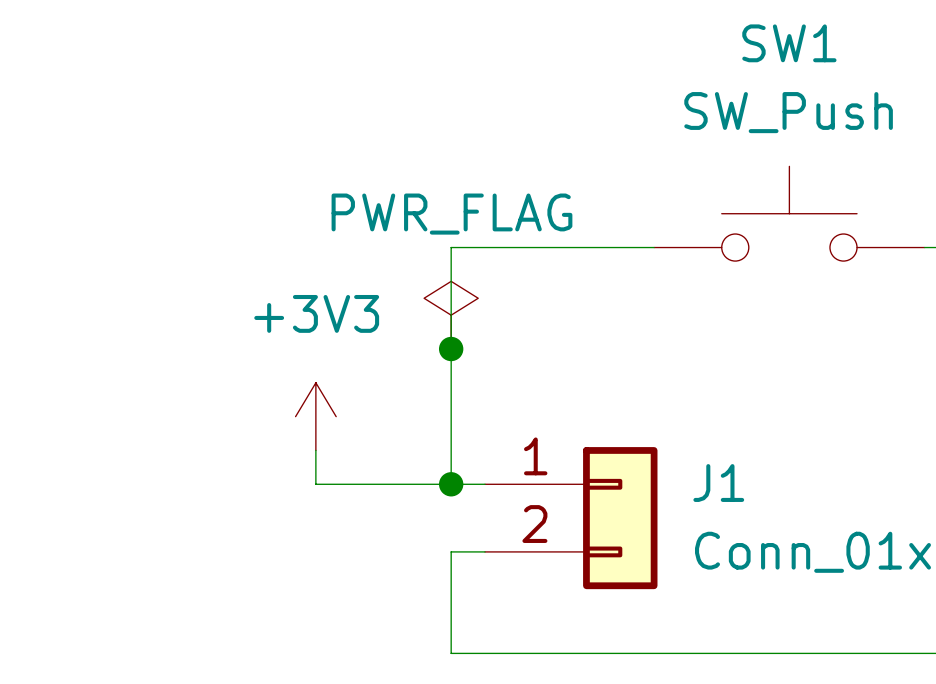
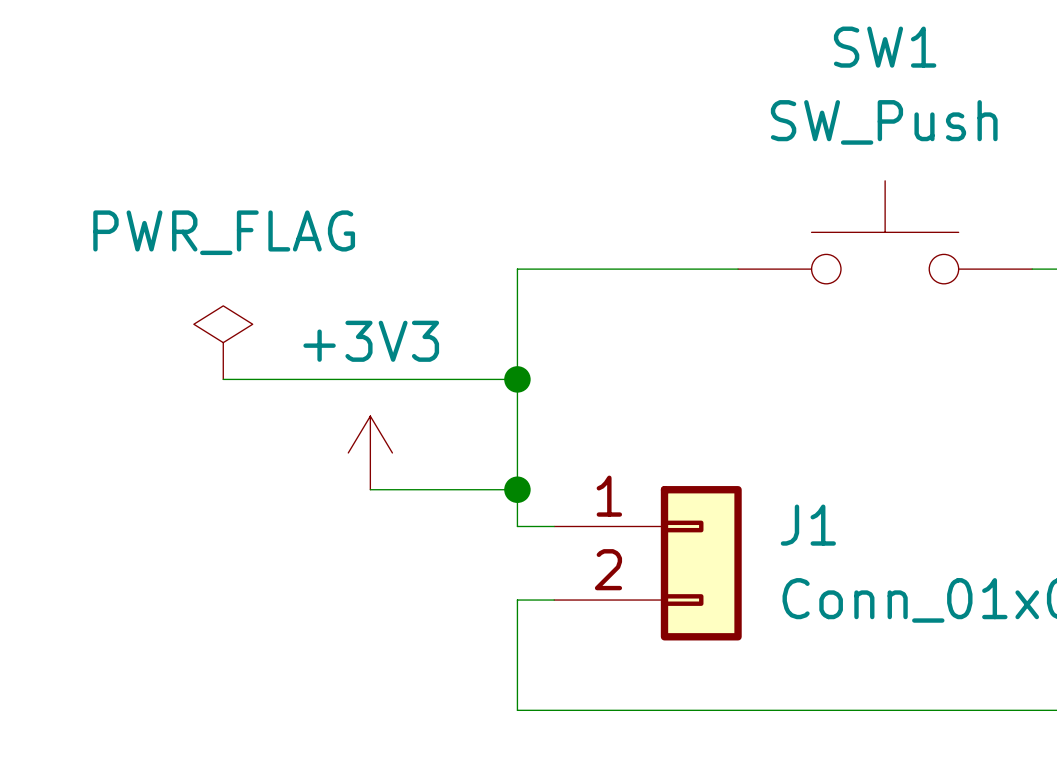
power symbol position: PWR_FLAG (451, 315) -> PWR_FLAG (223, 342)
wire: none -> (223, 379) (517, 379)
wire: (315, 450) (315, 484) (451, 484) -> (370, 489) (517, 489)
junction position: (451, 484) -> (517, 489)

